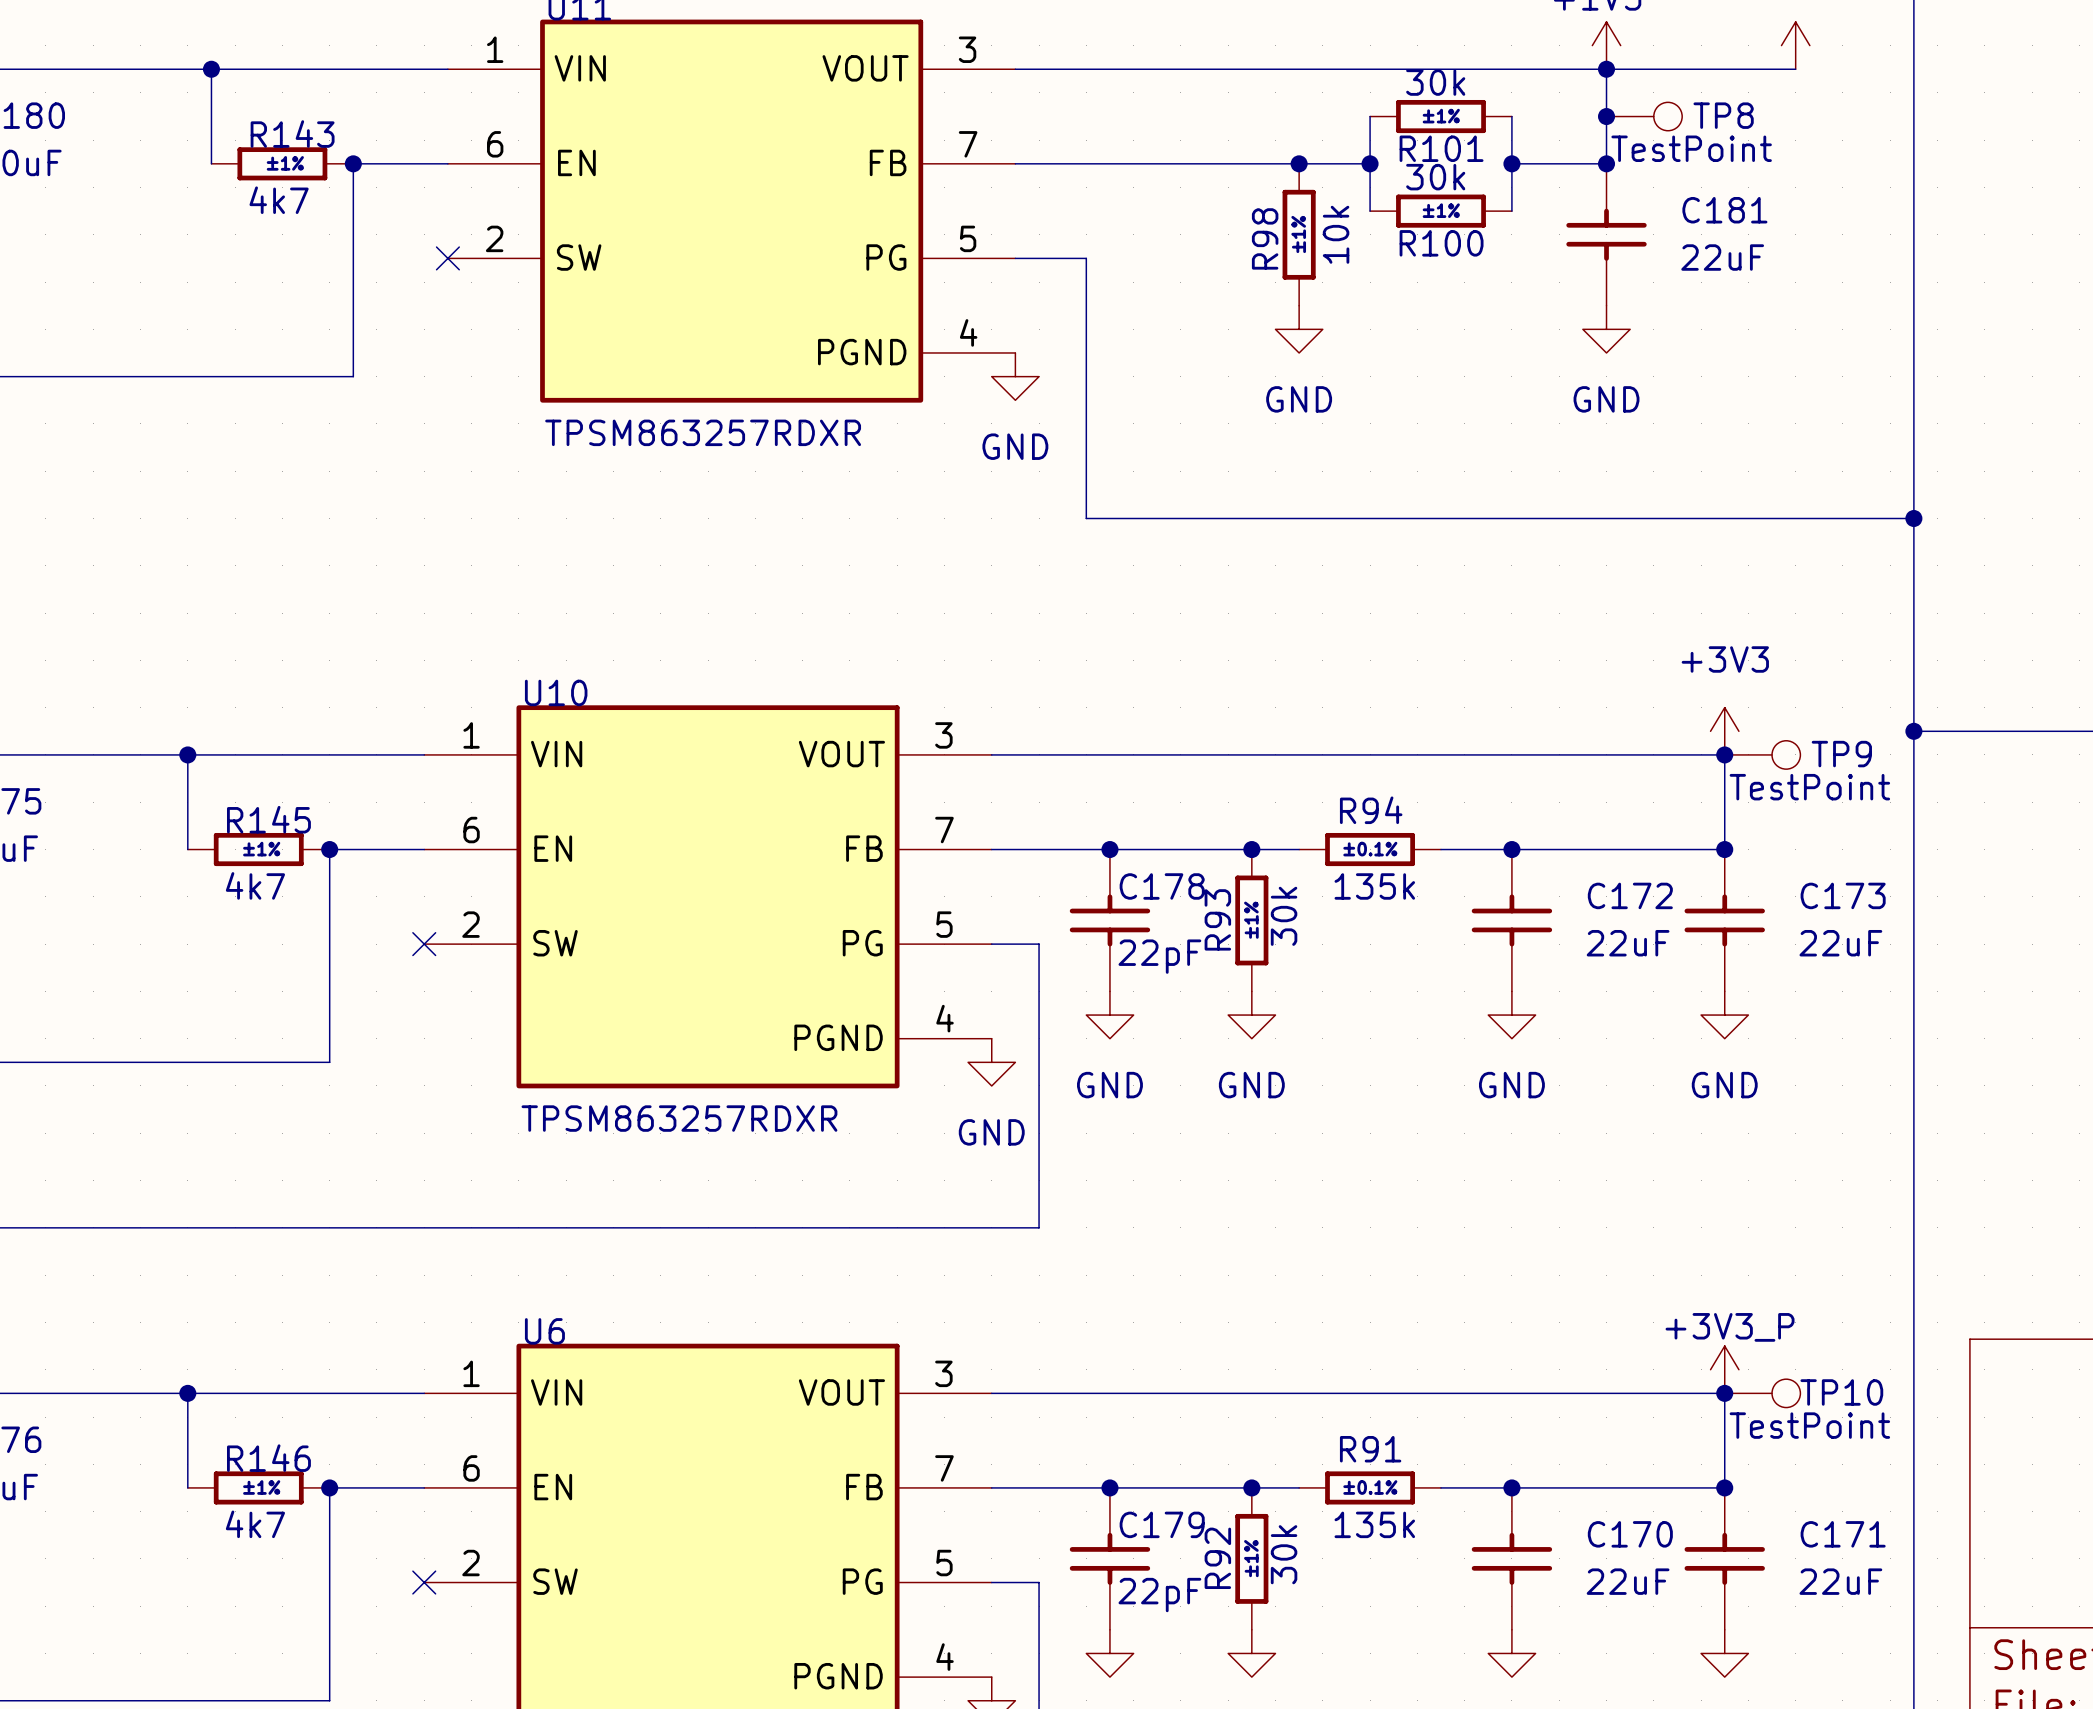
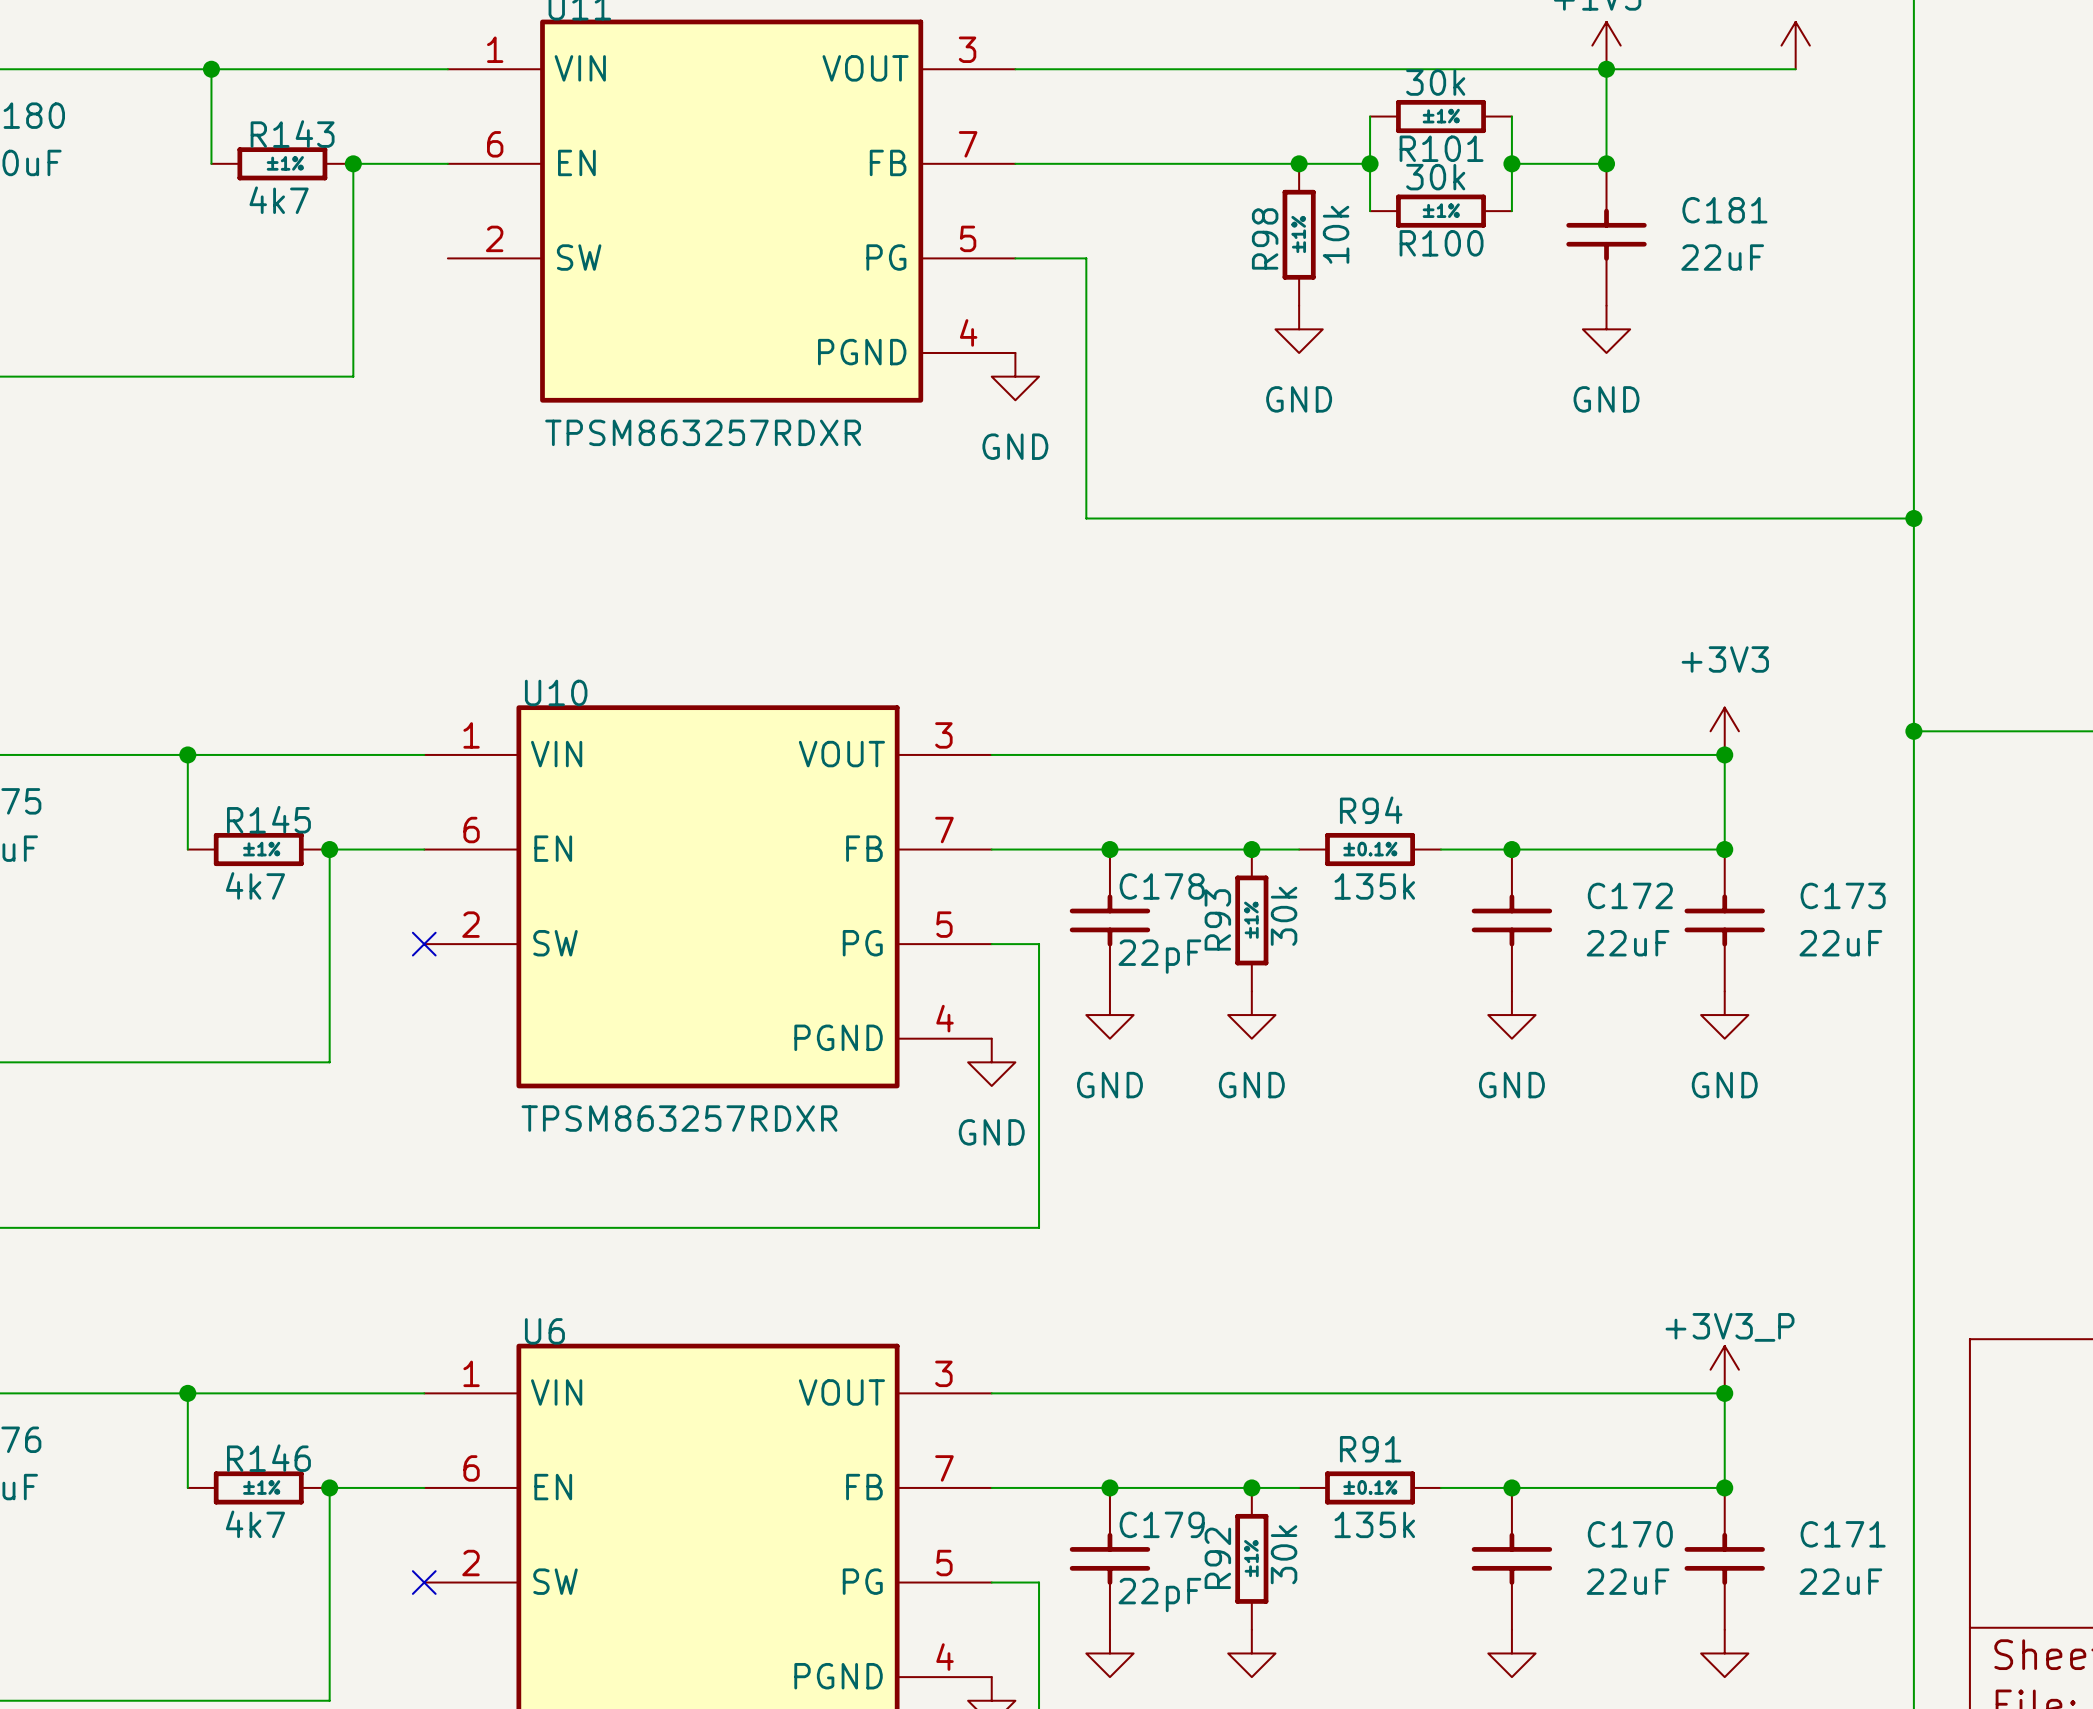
junction: (1606, 116) -> none
TP8: TestPoint (1644, 116) -> none
no-connect mark: (447, 258) -> none
TP9: TestPoint (1762, 754) -> none
TP10: TestPoint (1762, 1393) -> none

